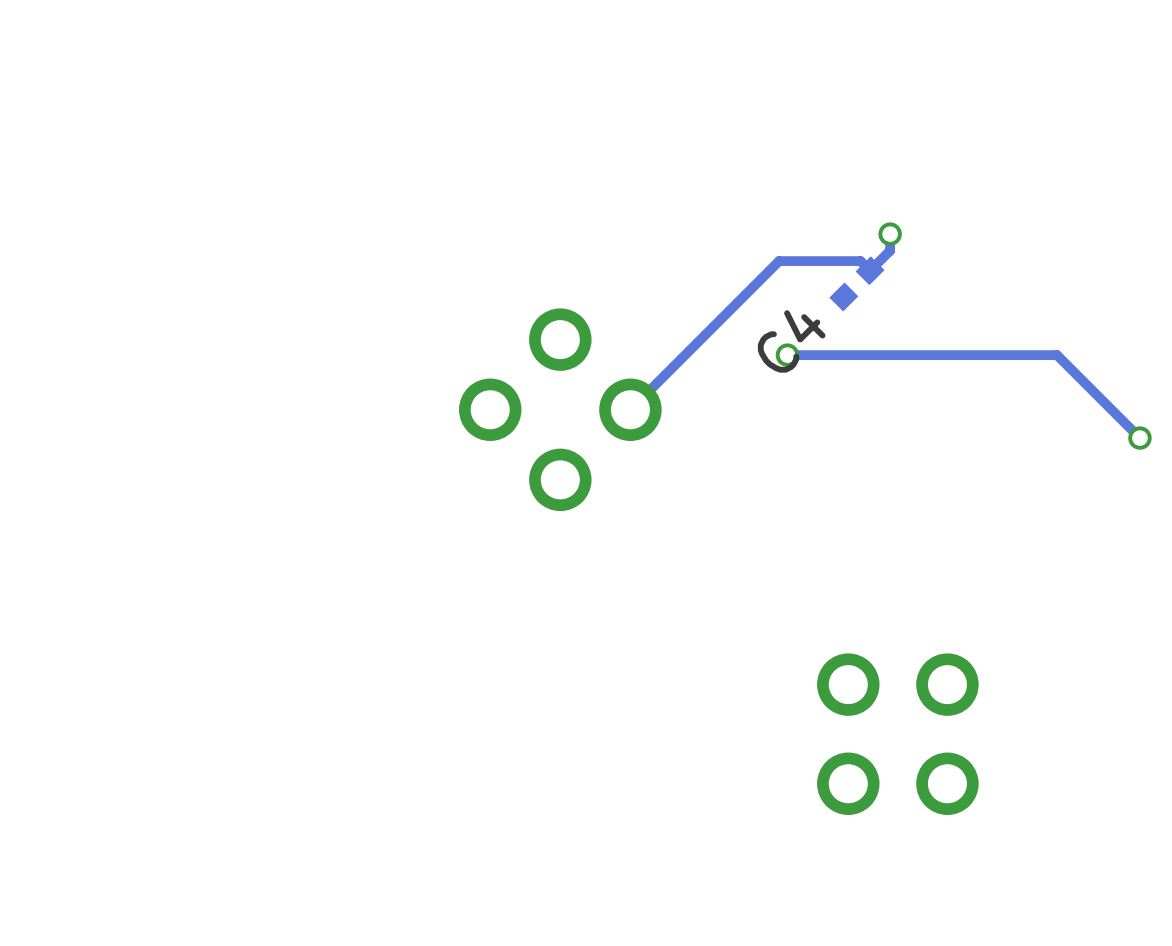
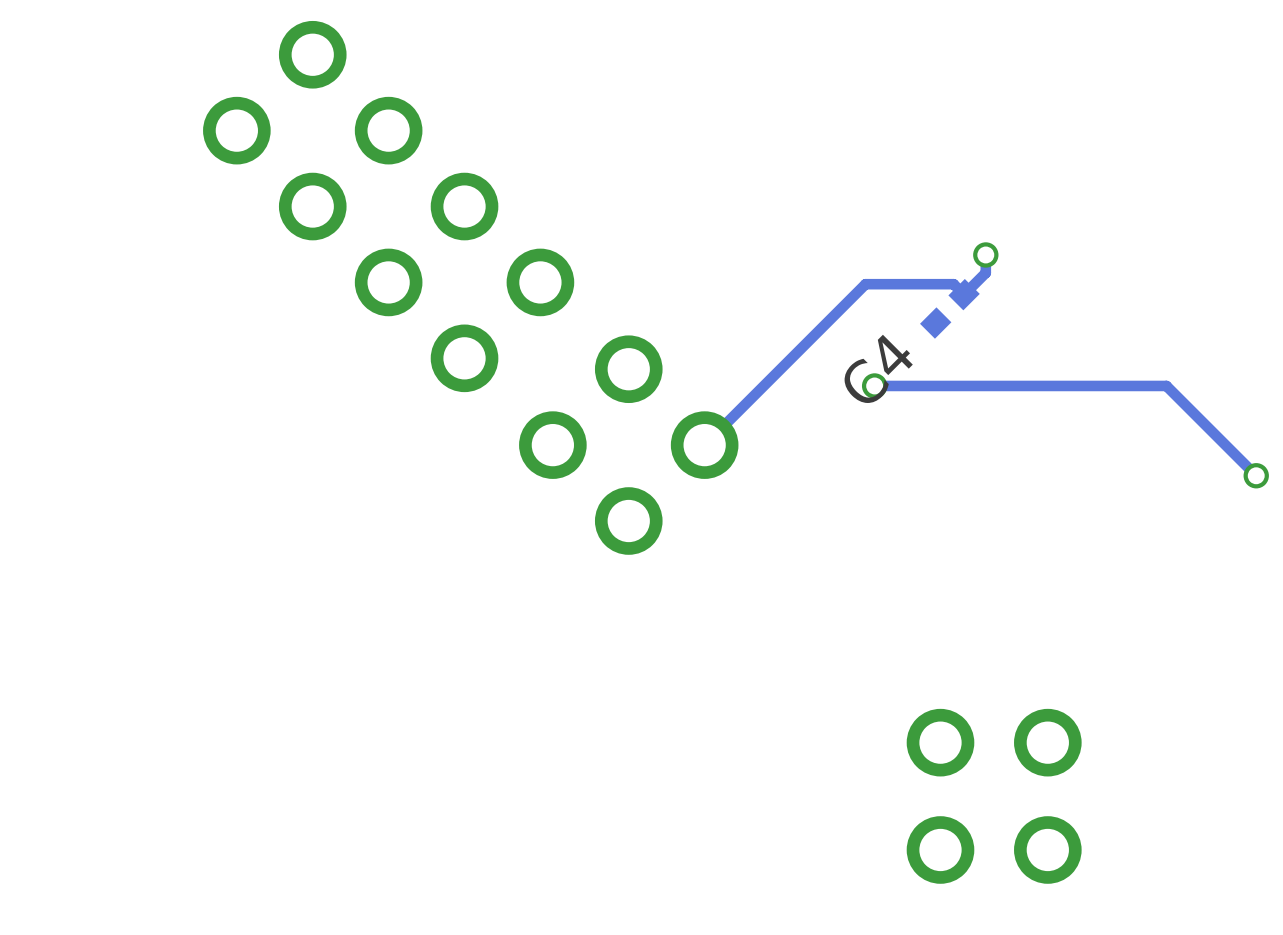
part: none -> (388, 206)

